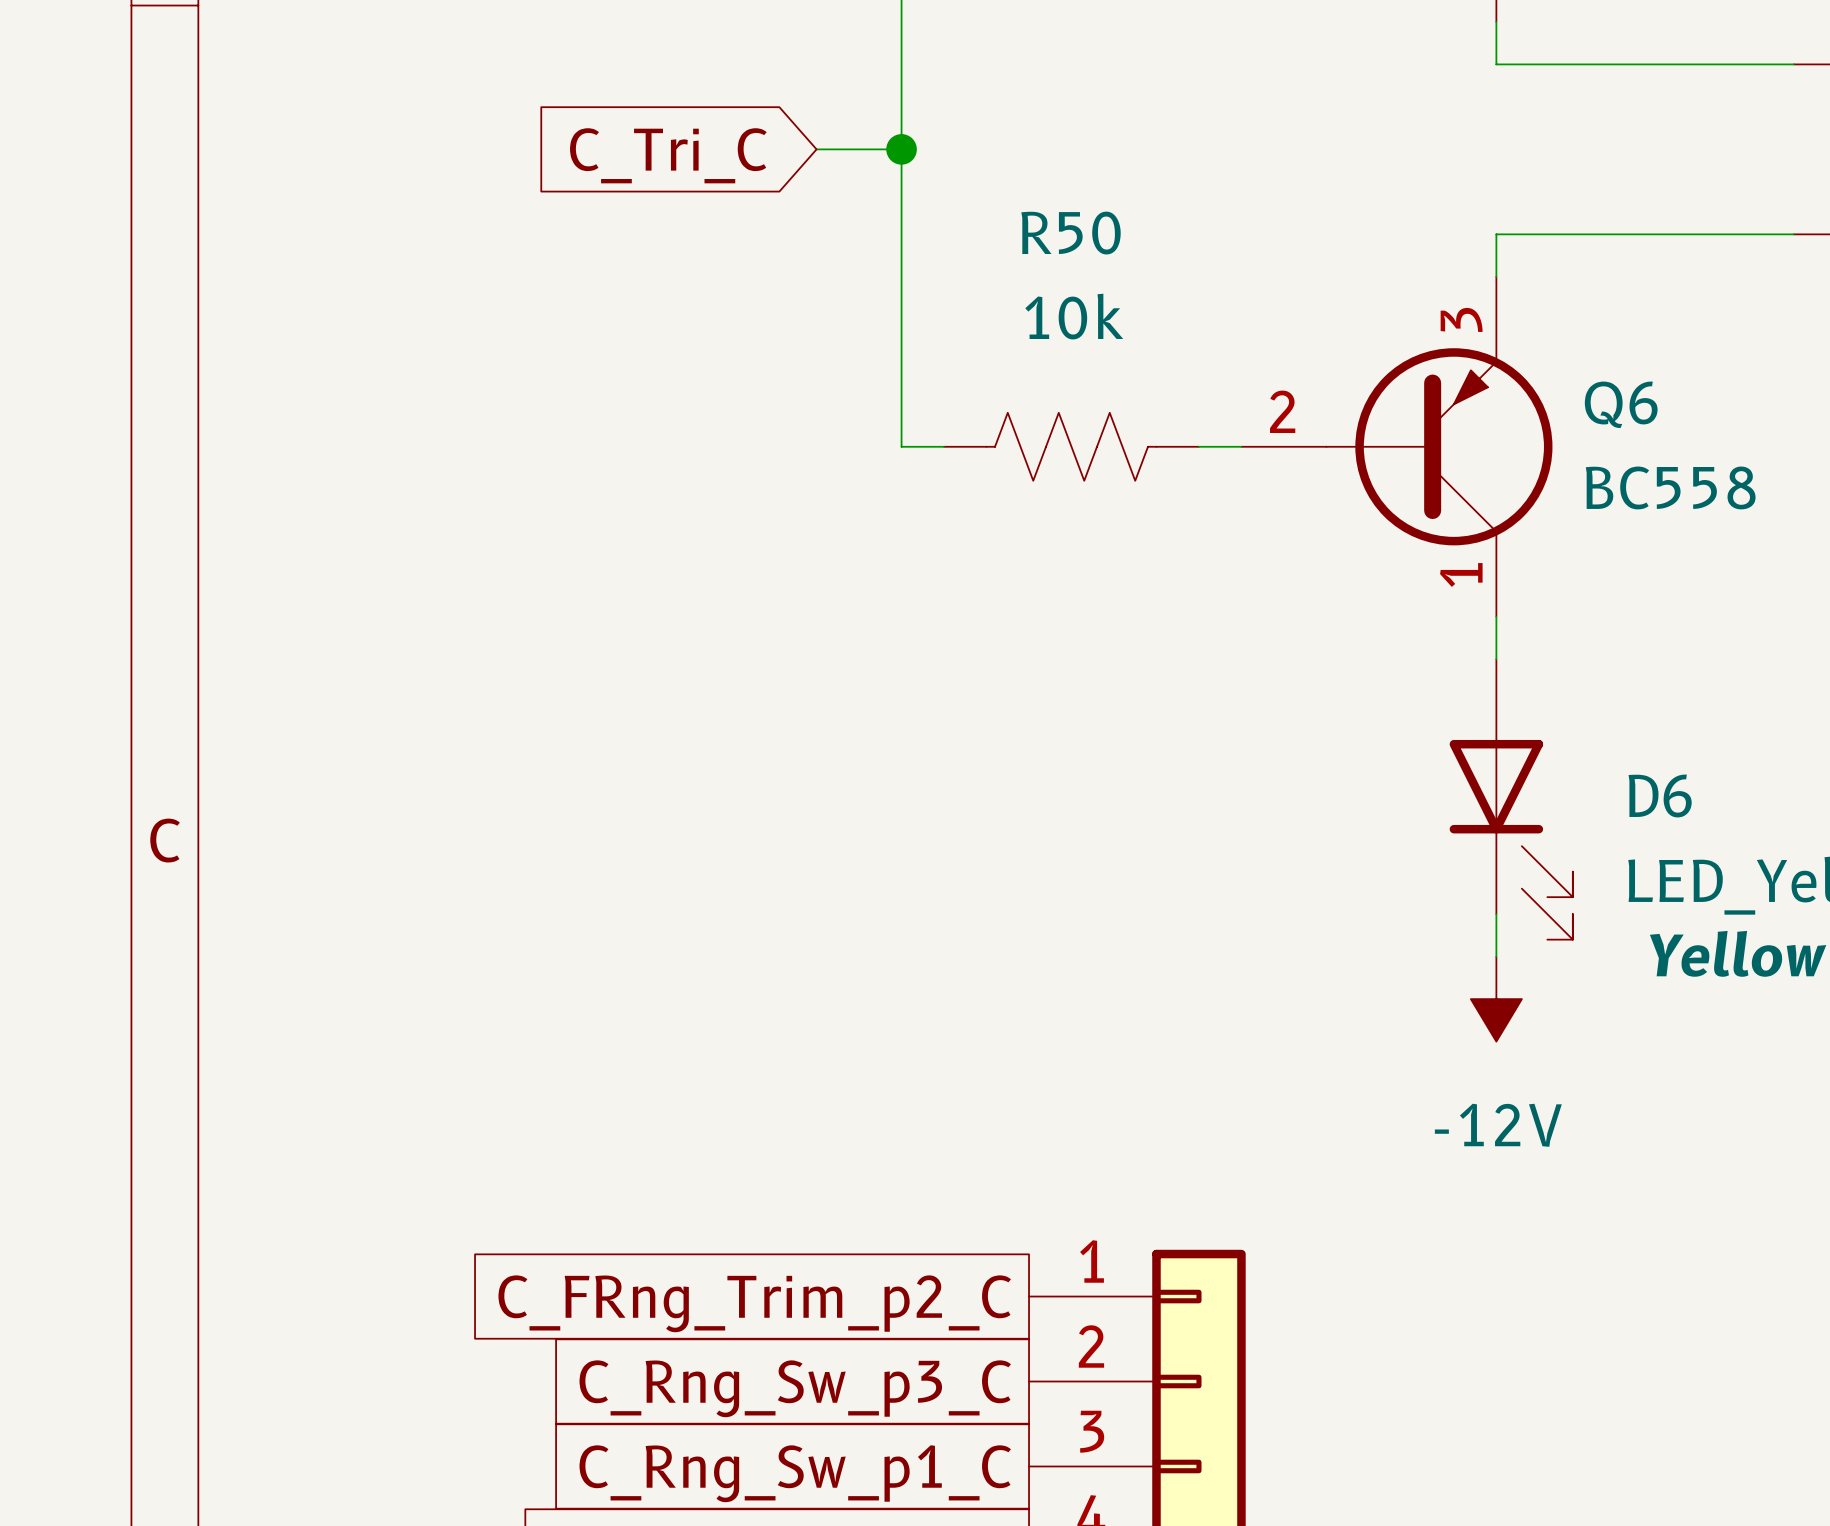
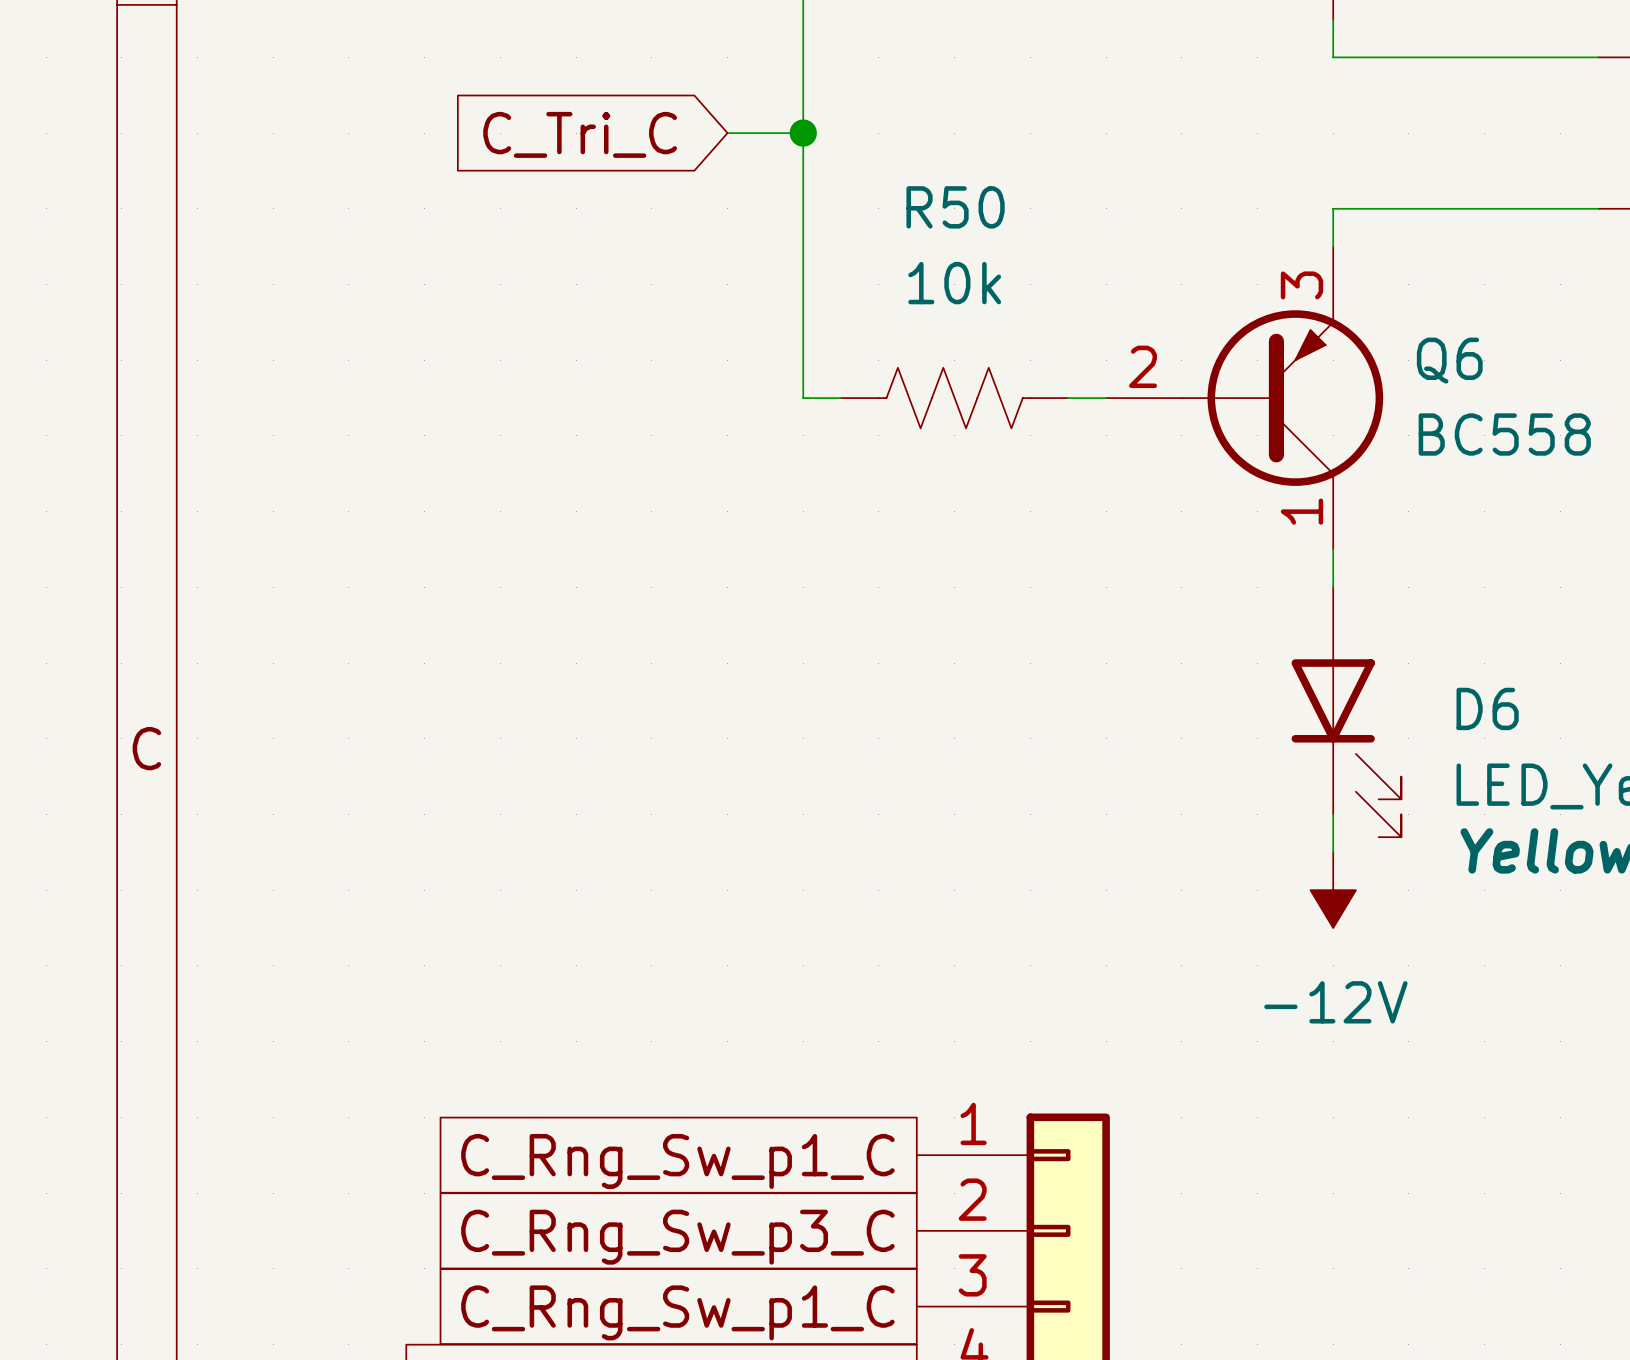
global label: C_FRng_Trim_p2_C (754, 1303) -> C_Rng_Sw_p1_C (677, 1161)

